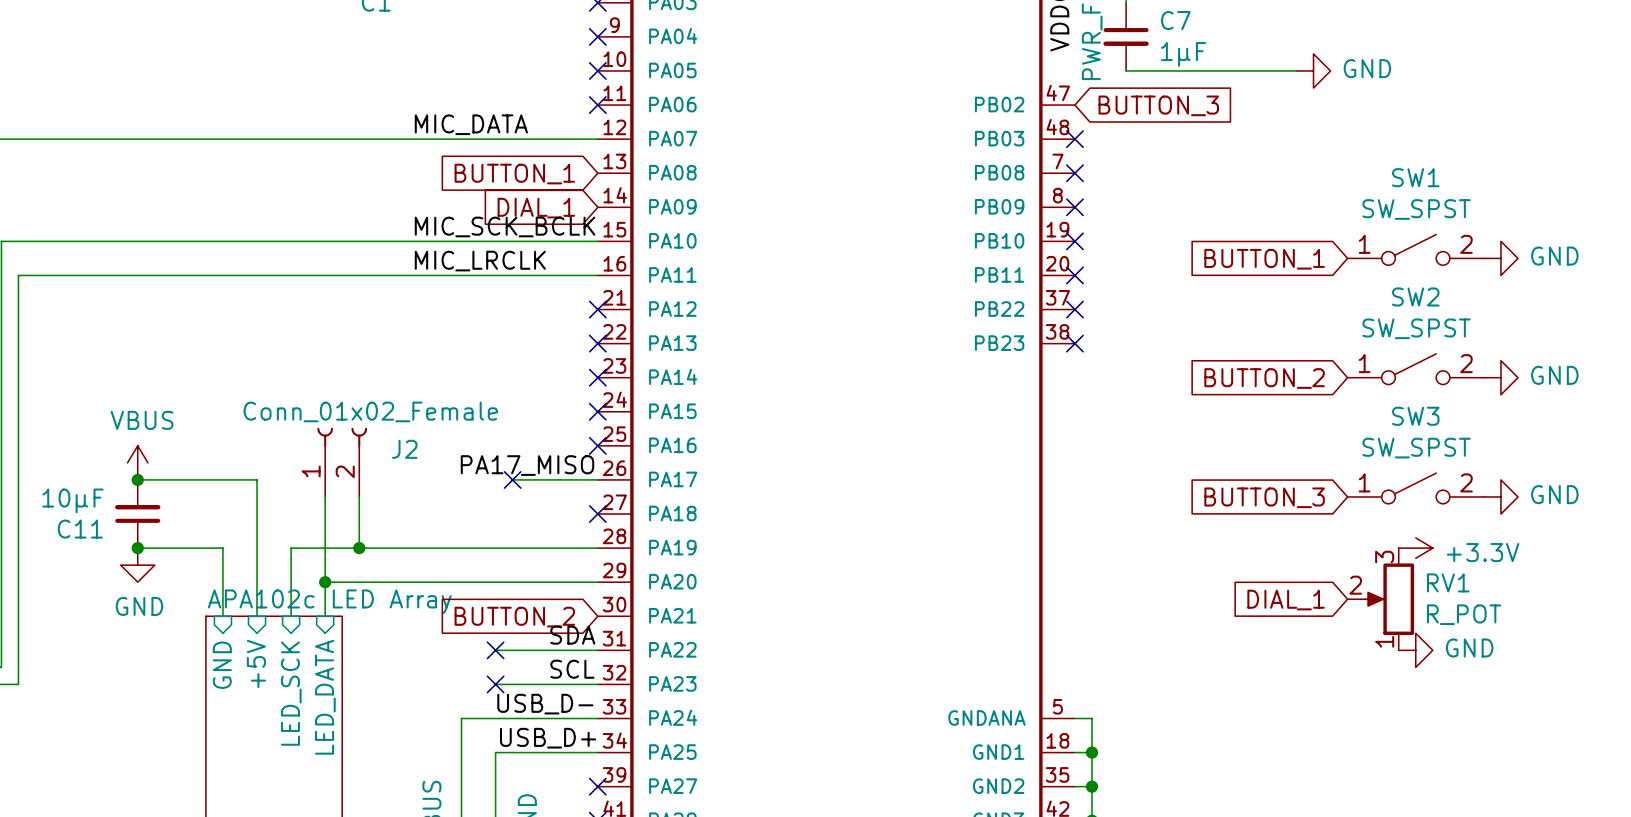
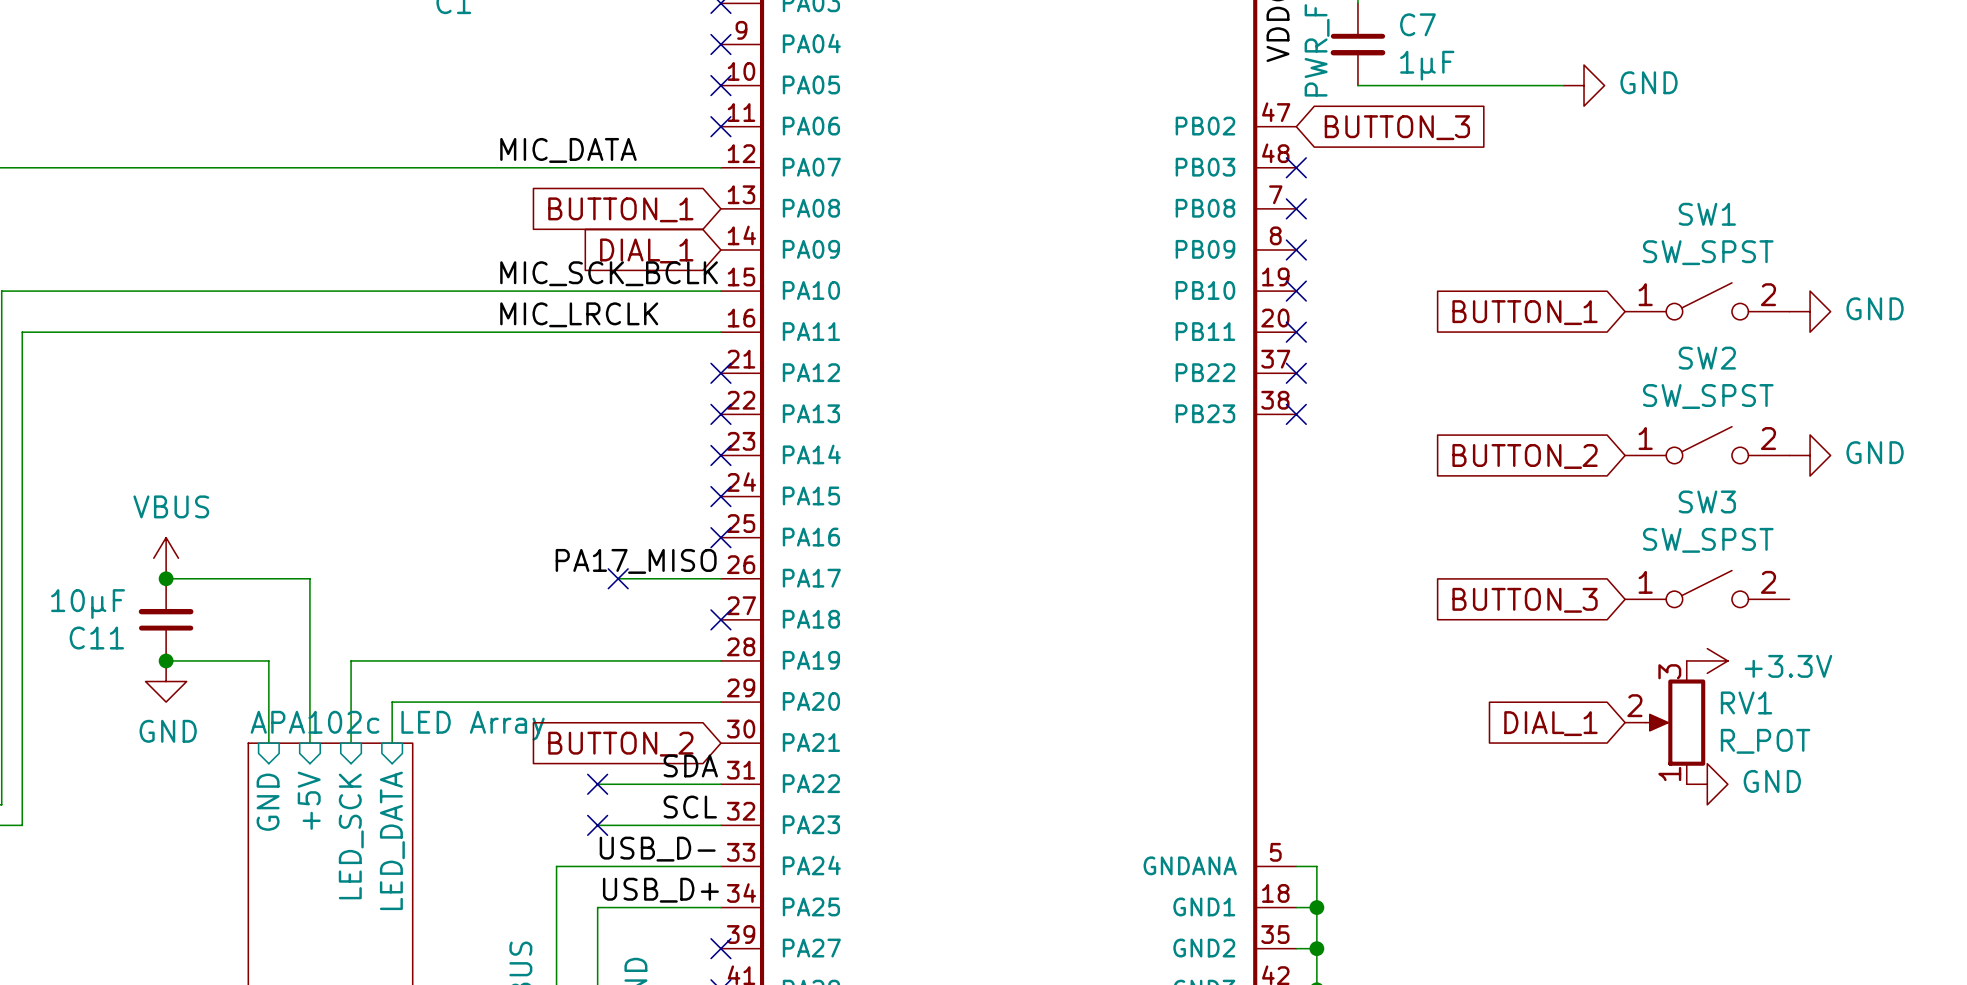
J2: Conn_01x02_Female (342, 462) -> none
wire: (325, 496) (325, 582) -> none
wire: (359, 496) (359, 548) -> none
power symbol: GND (1500, 496) -> none
junction: (359, 548) -> none
junction: (325, 582) -> none

